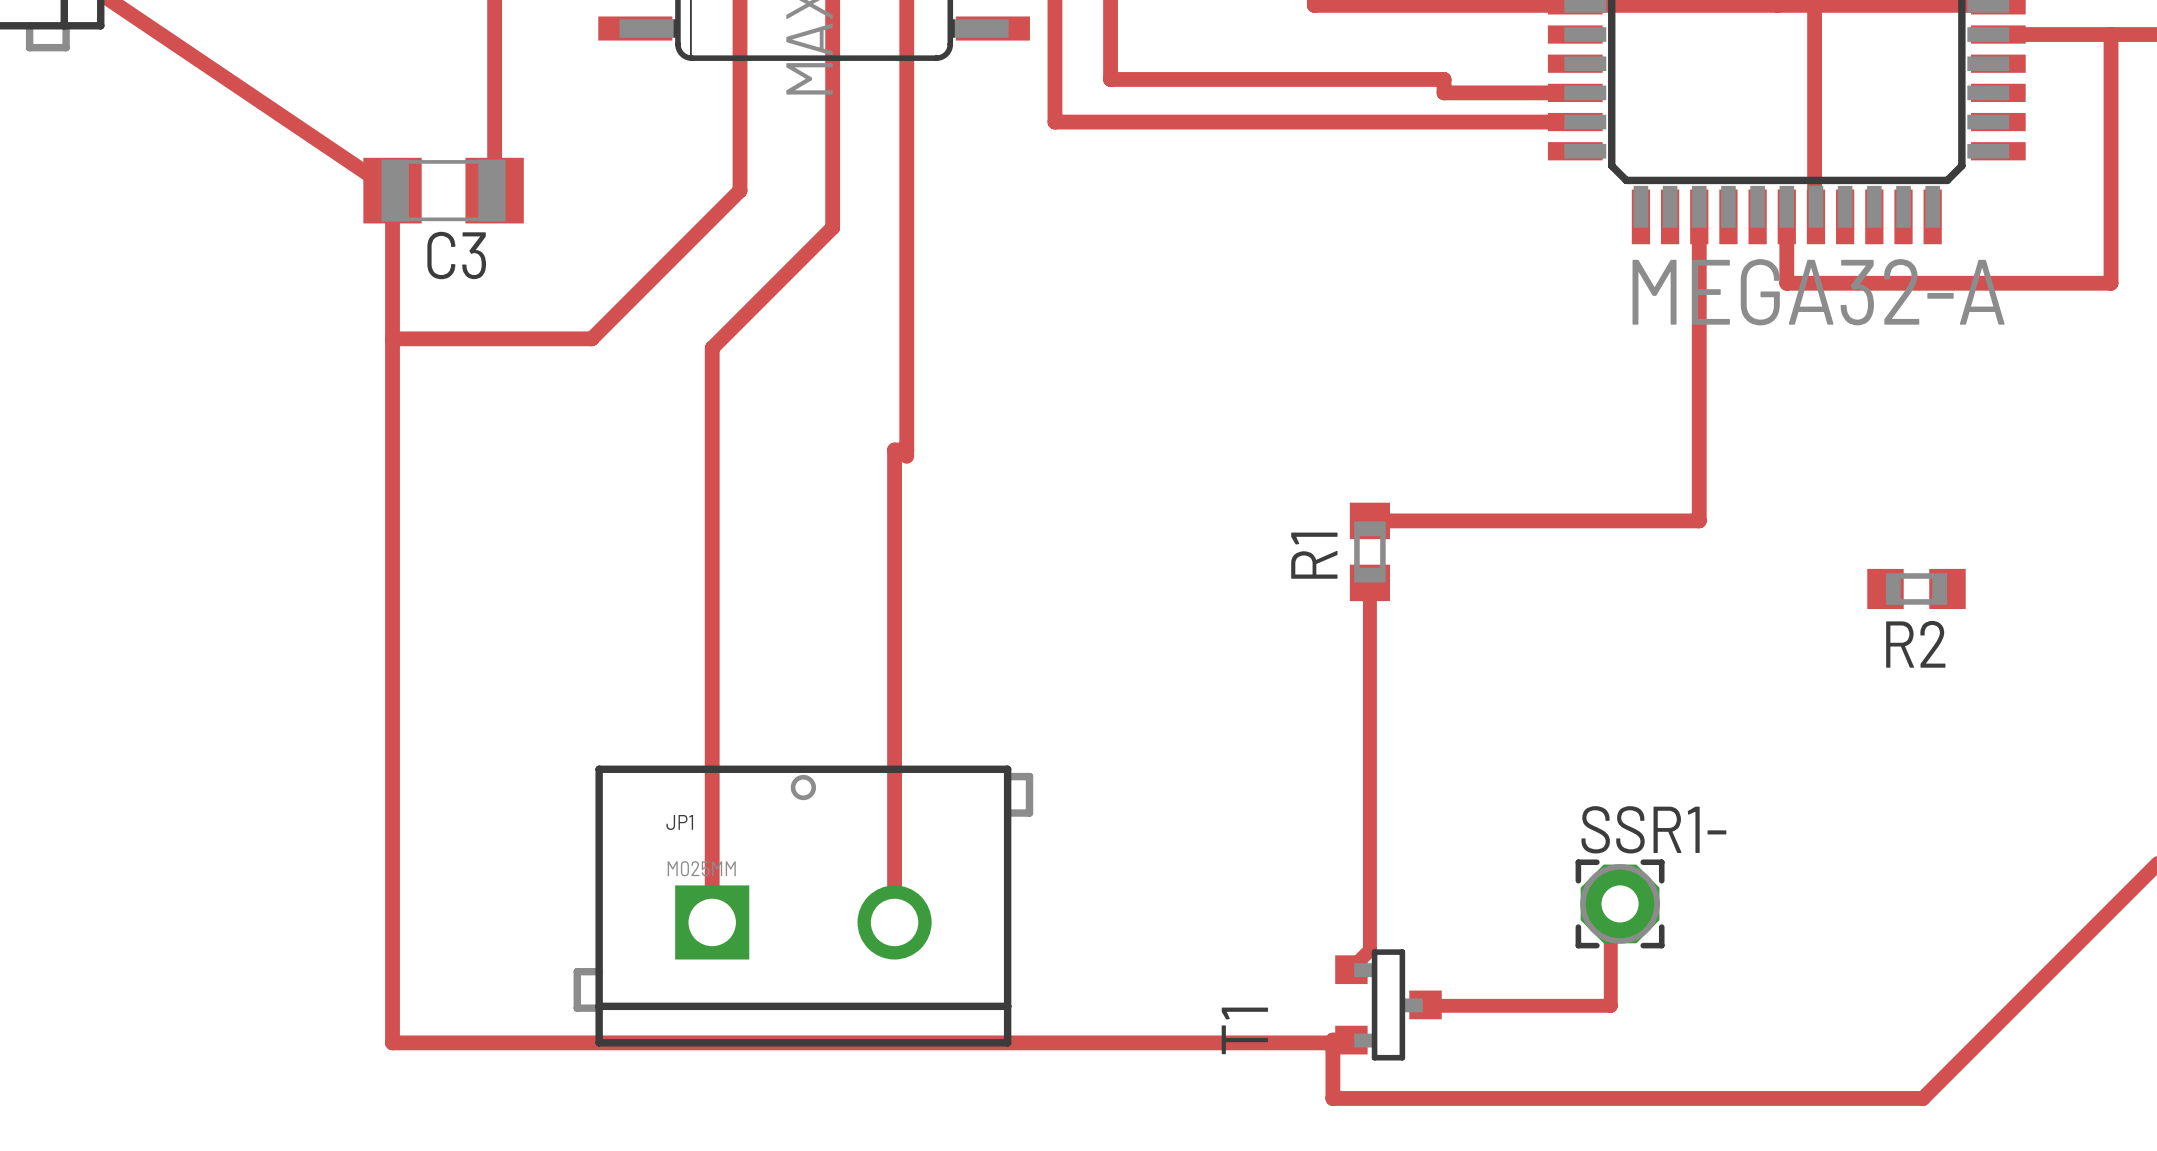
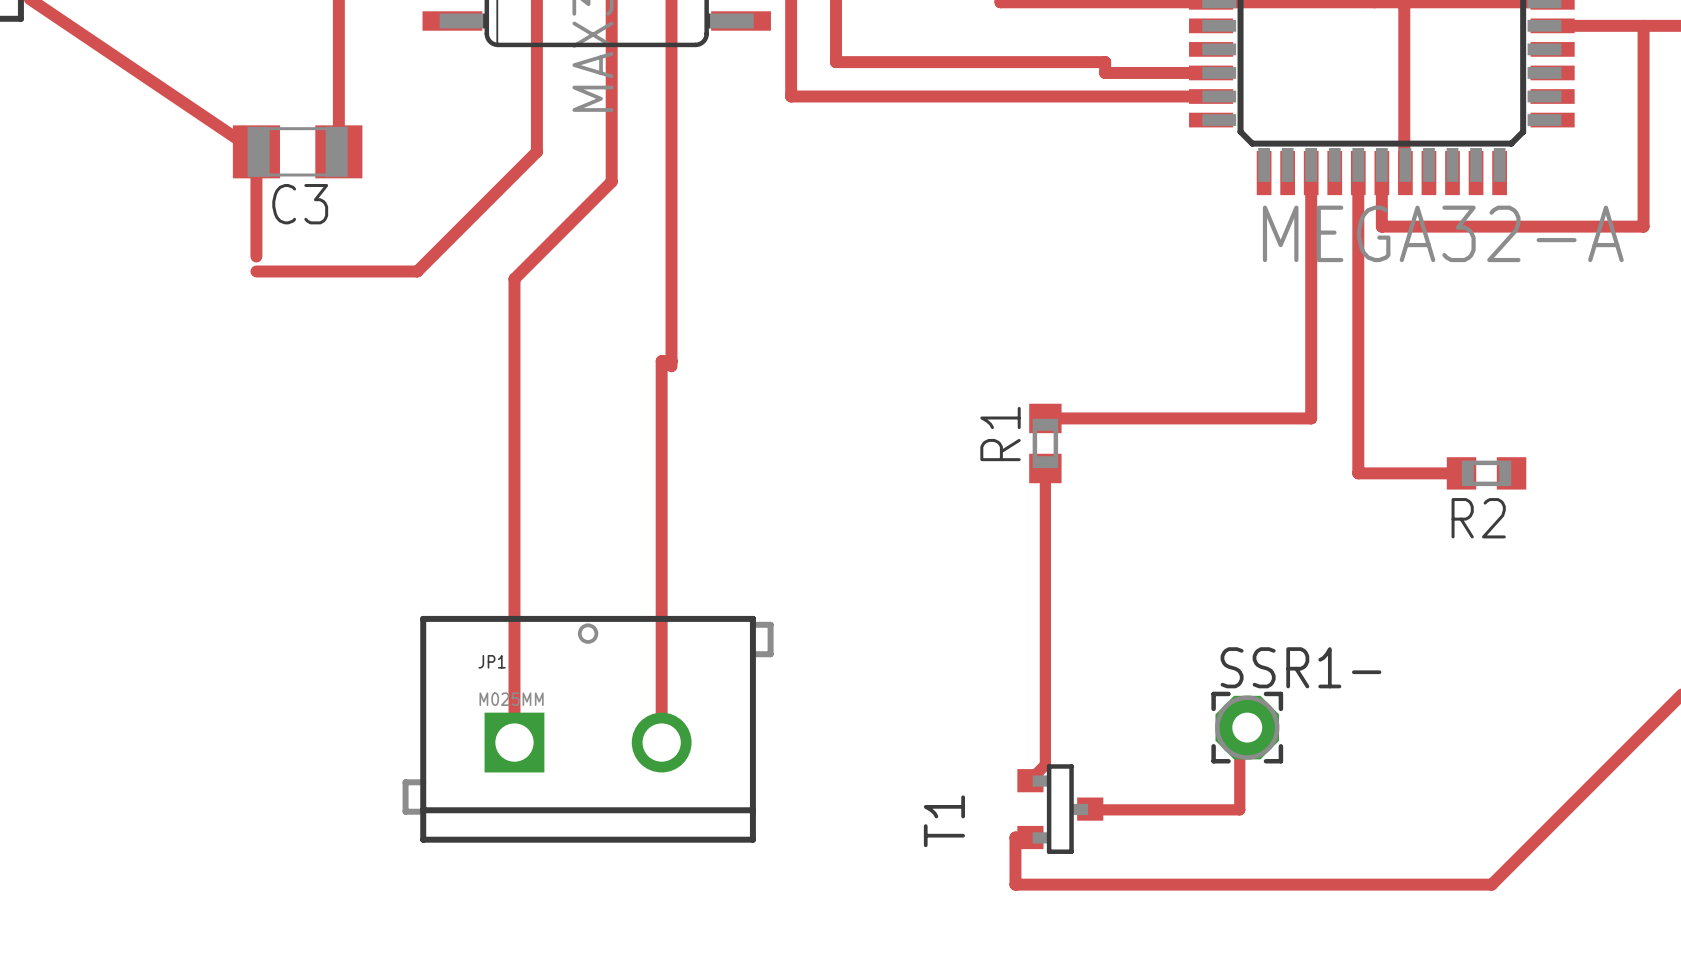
track: none -> (1358, 173) (1358, 473) (1461, 473)
track: (392, 320) (392, 1042) (1332, 1042) -> none

